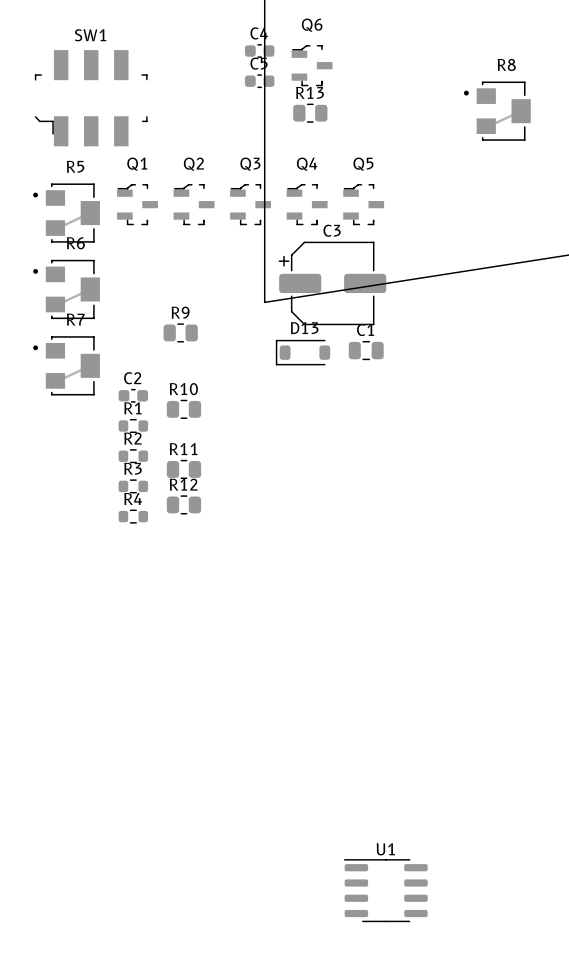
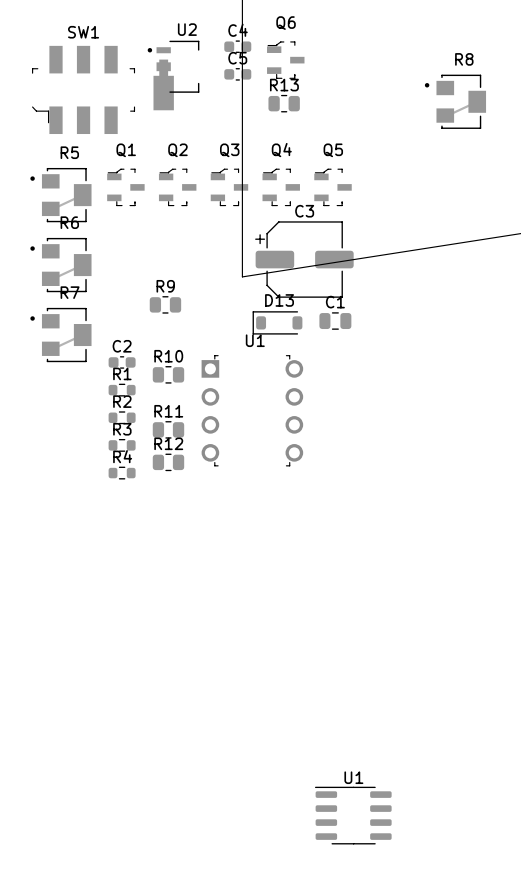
U2: none -> (173, 75)
U1: none -> (252, 410)

